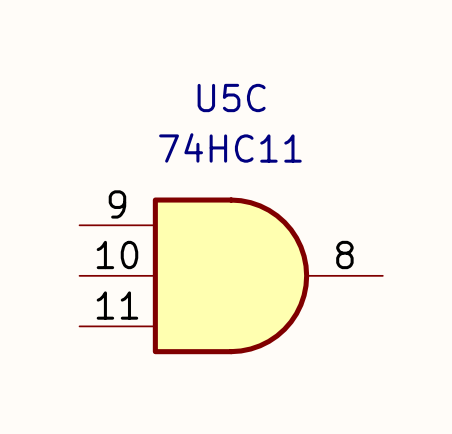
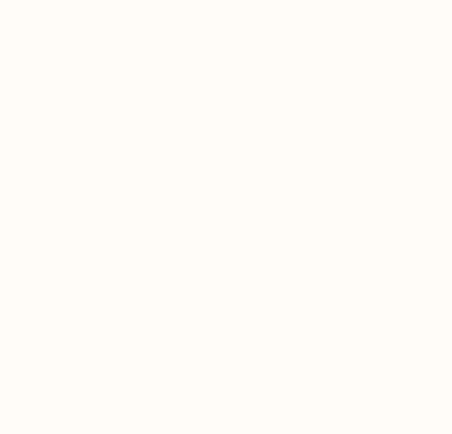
U5C: 74HC11 (231, 275) -> none

